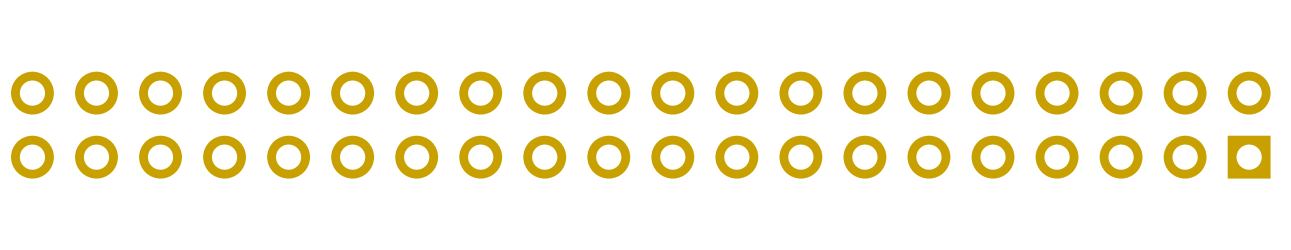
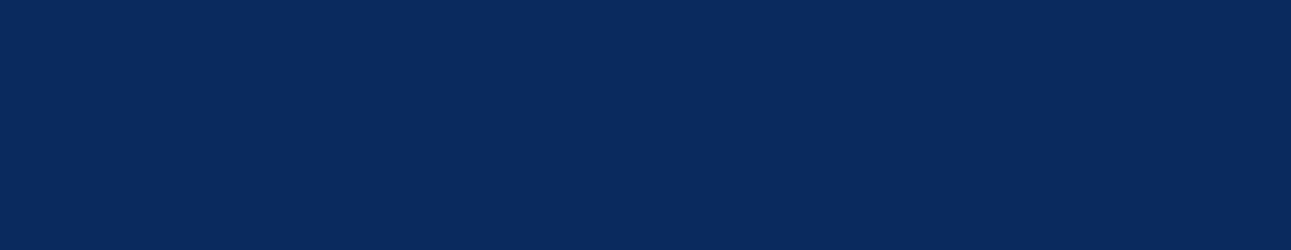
part: (640, 125) -> none

